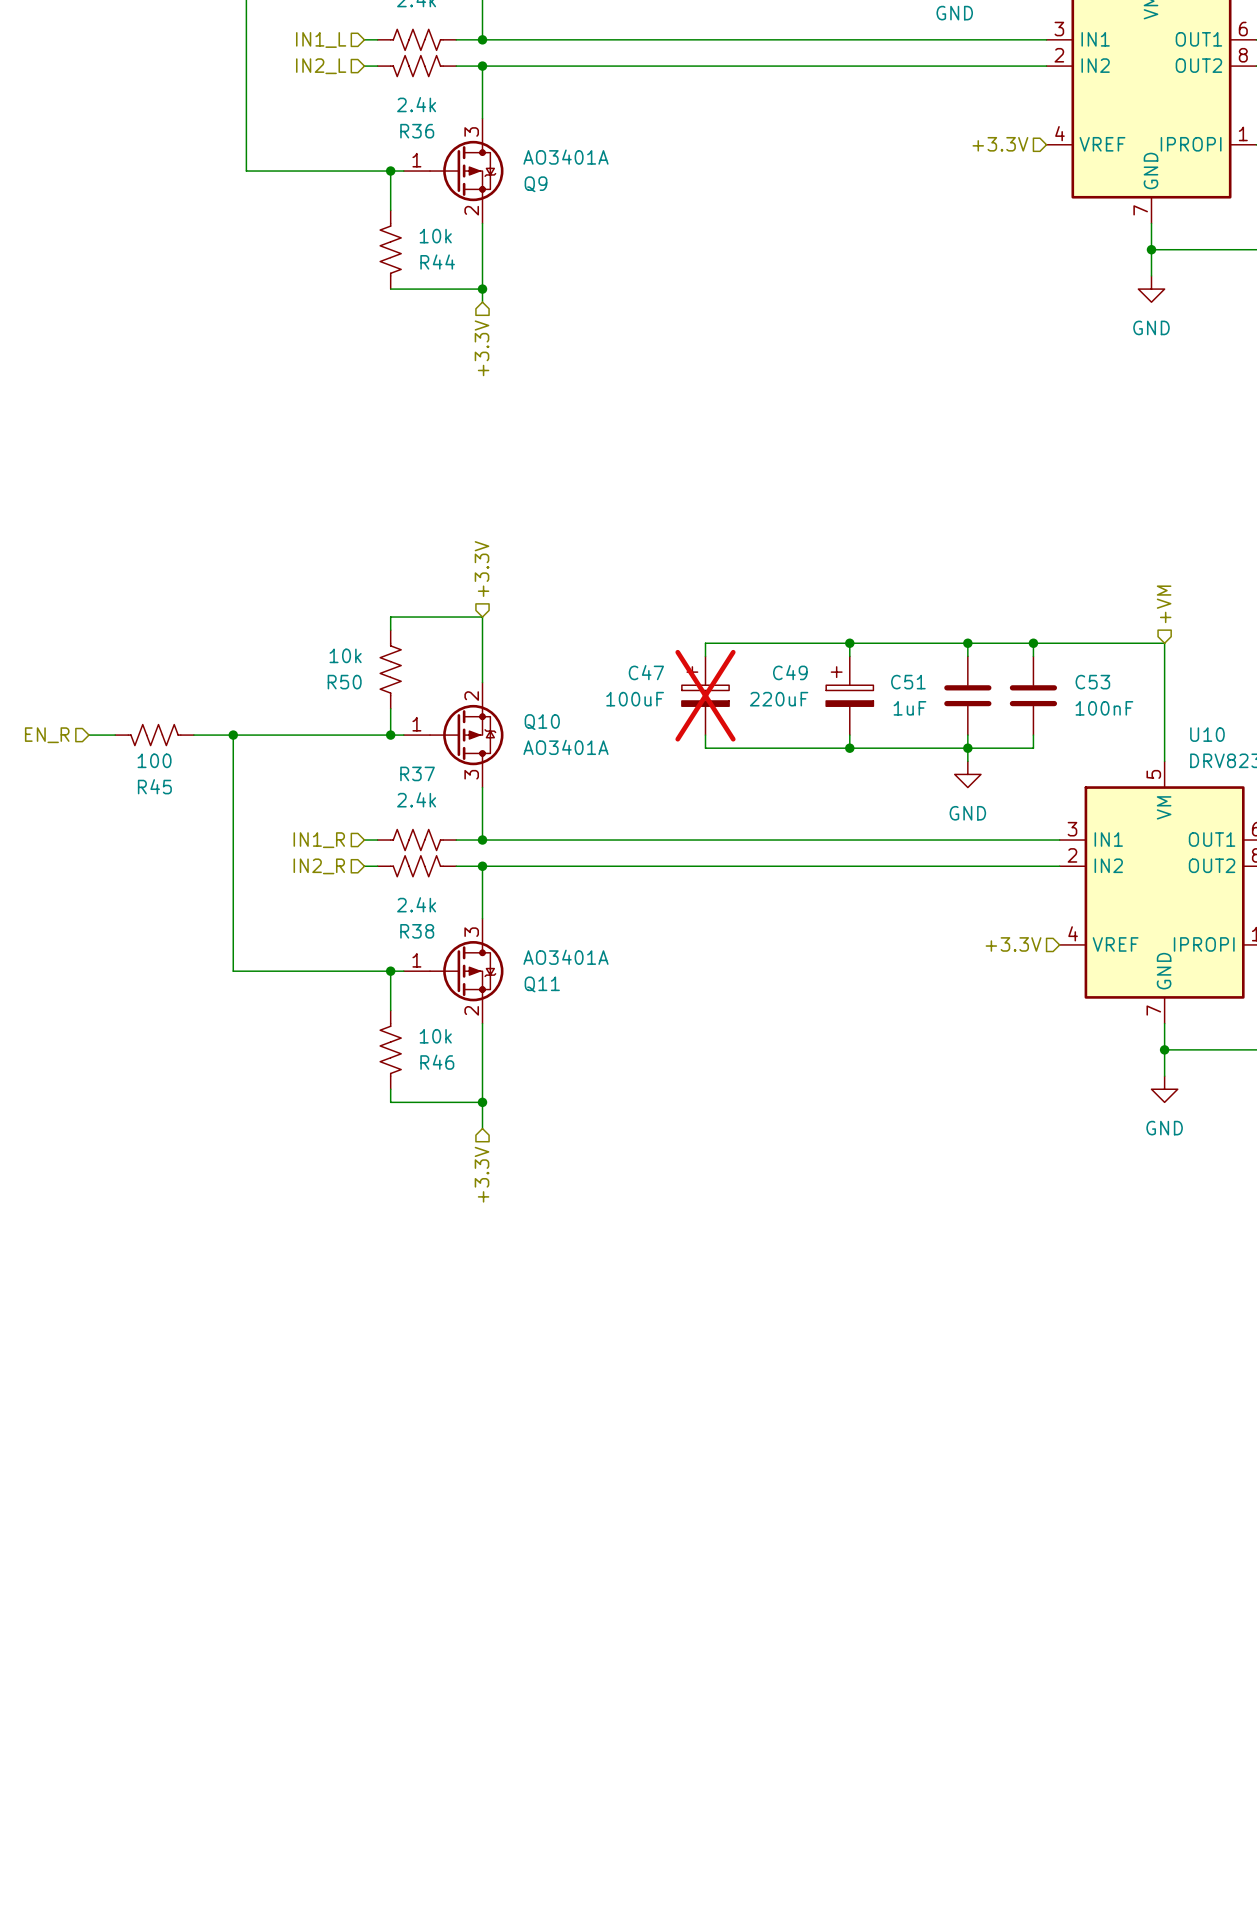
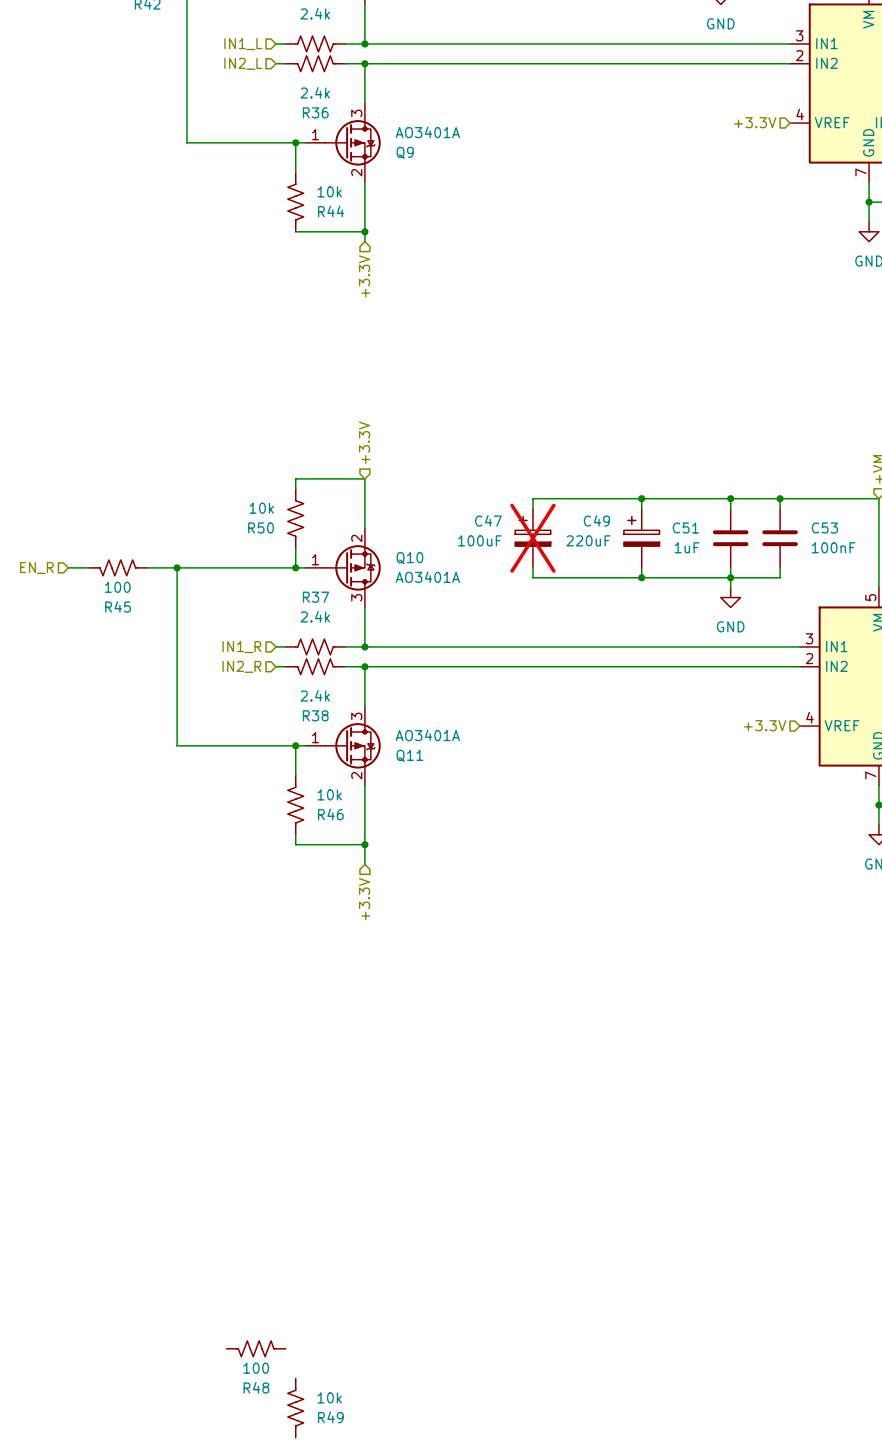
R48: none -> 100 (256, 1348)
R49: none -> 10k (295, 1408)

